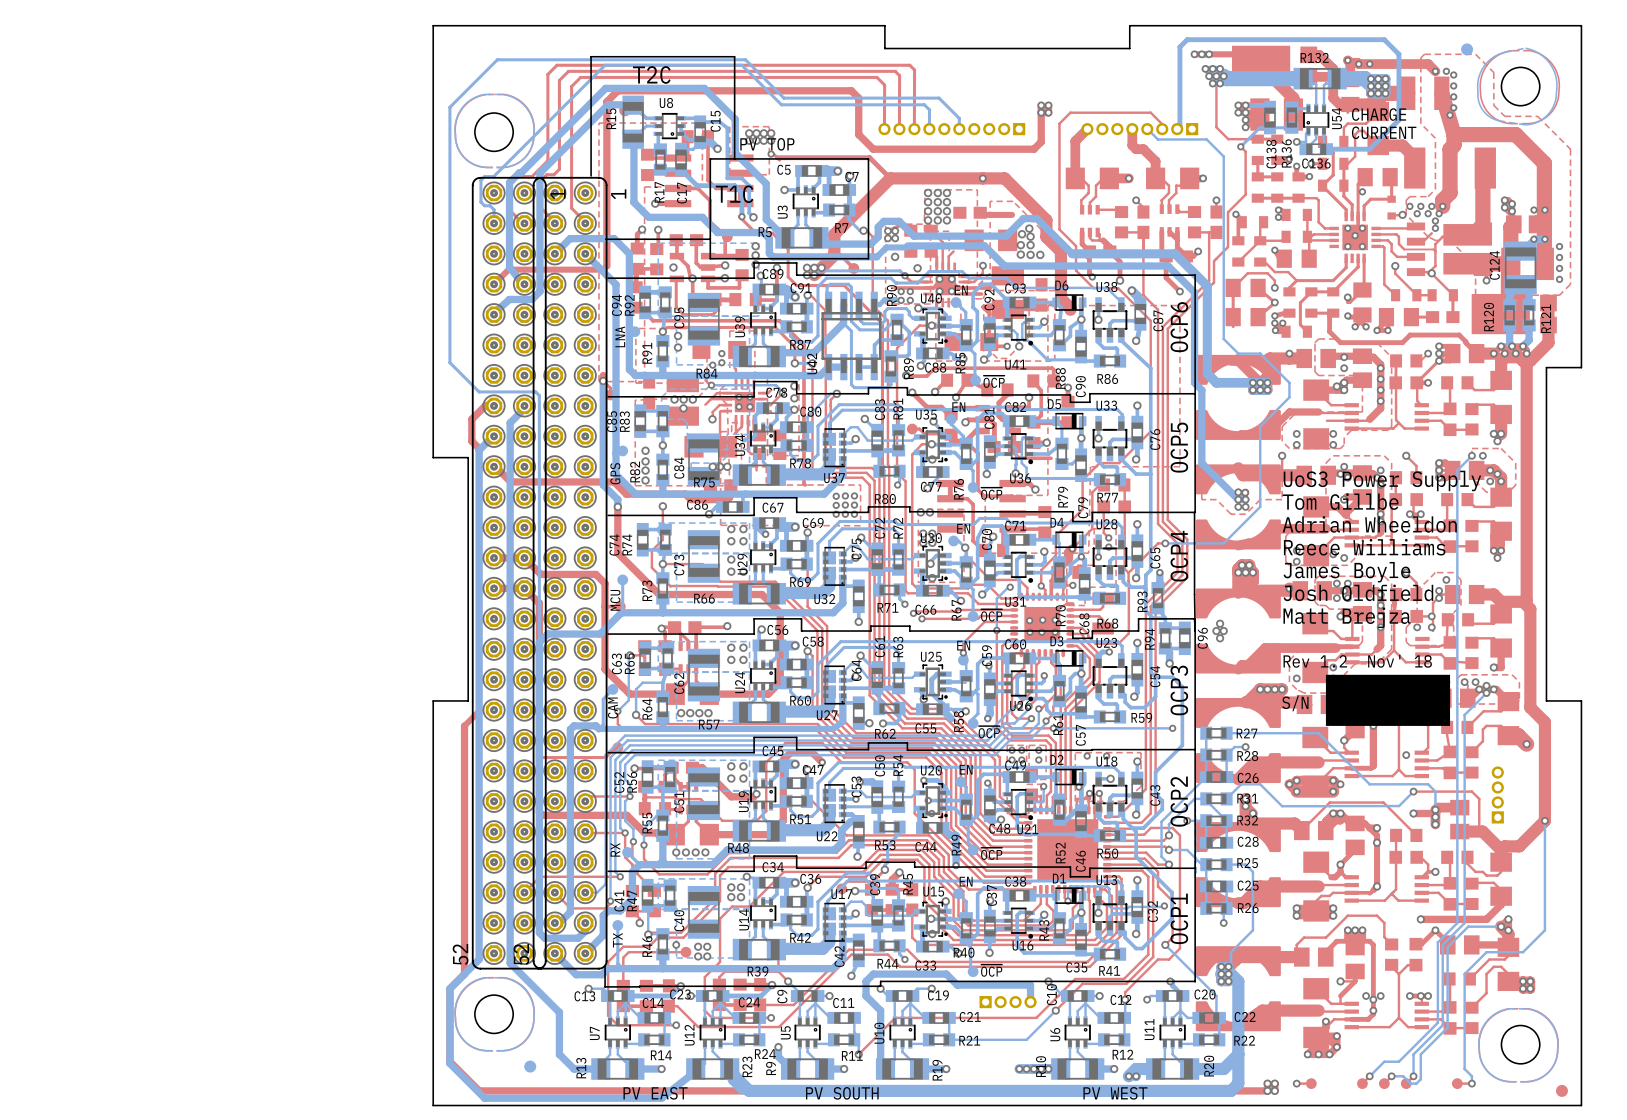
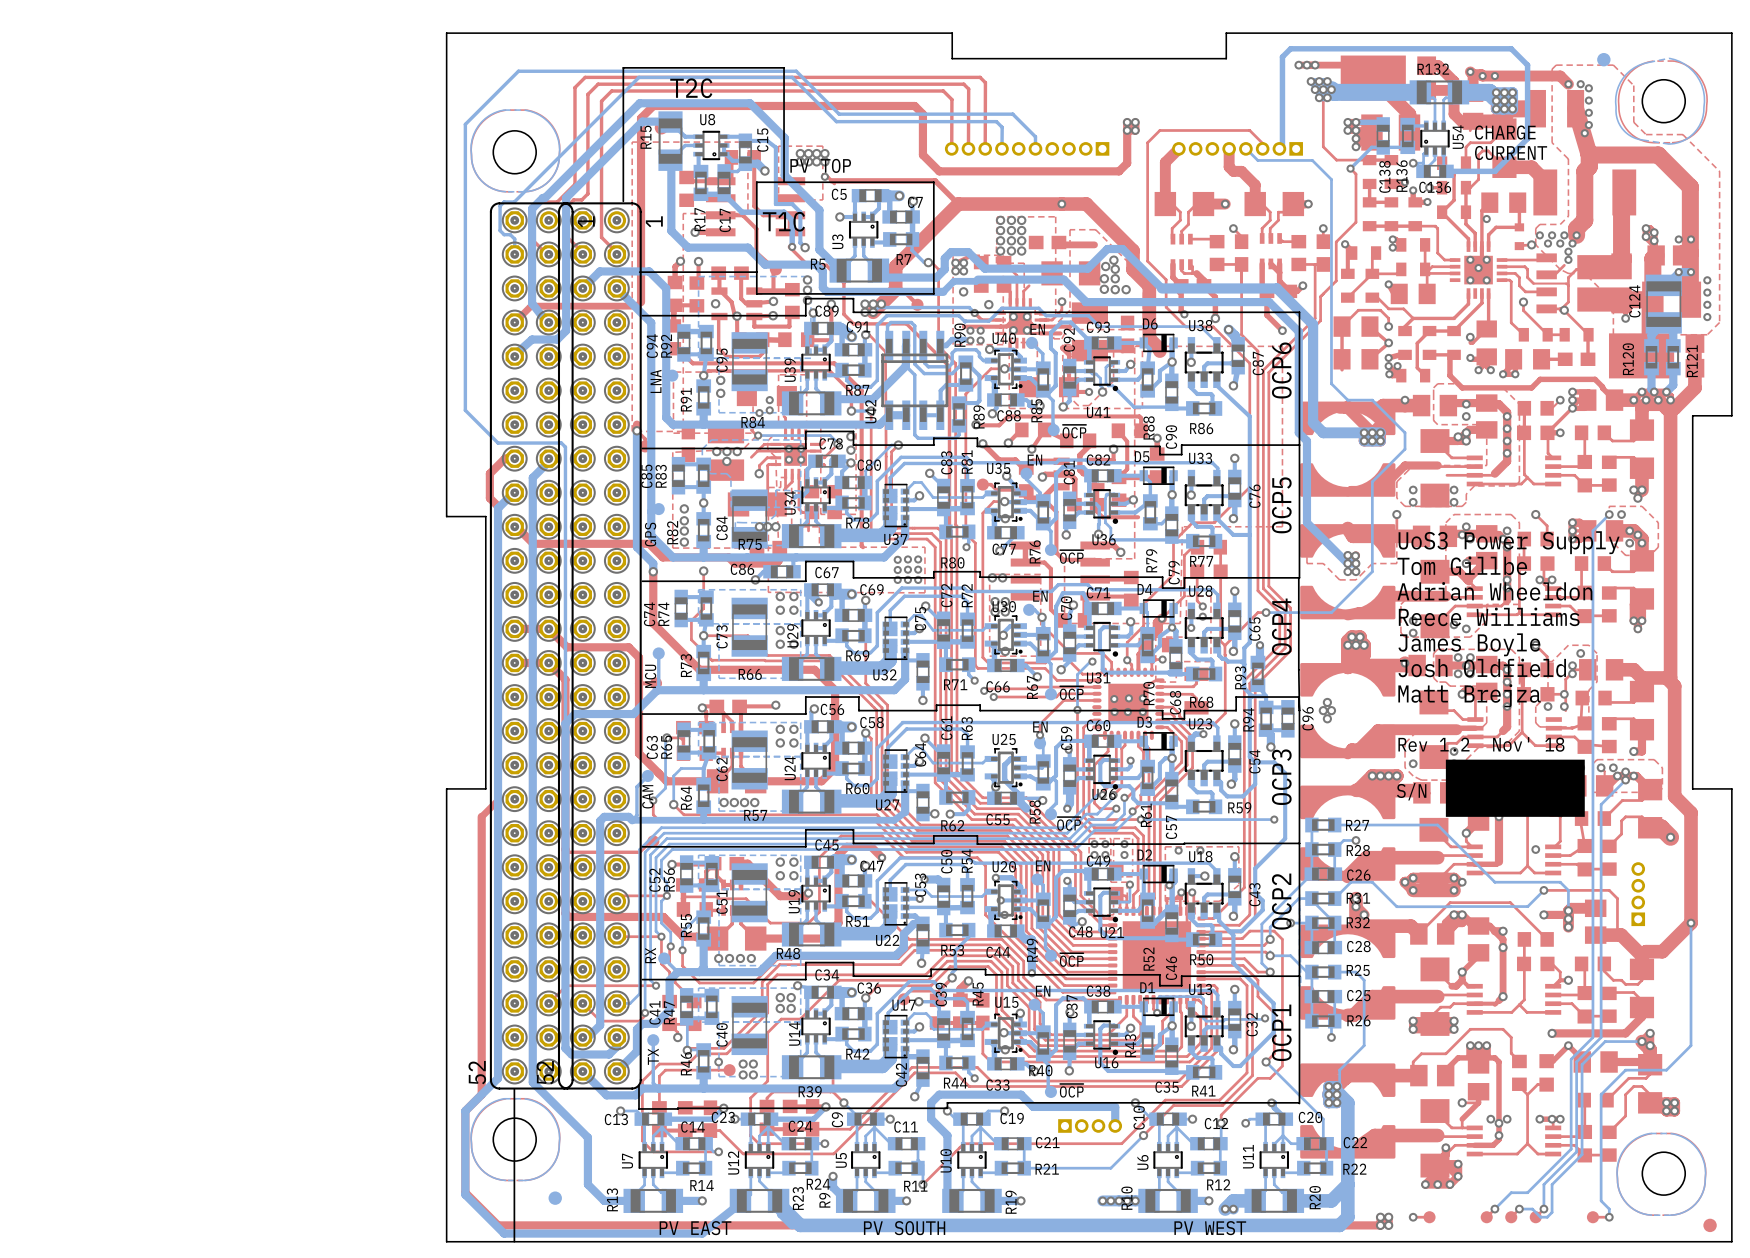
line: none -> (514, 1089) (514, 1241)

